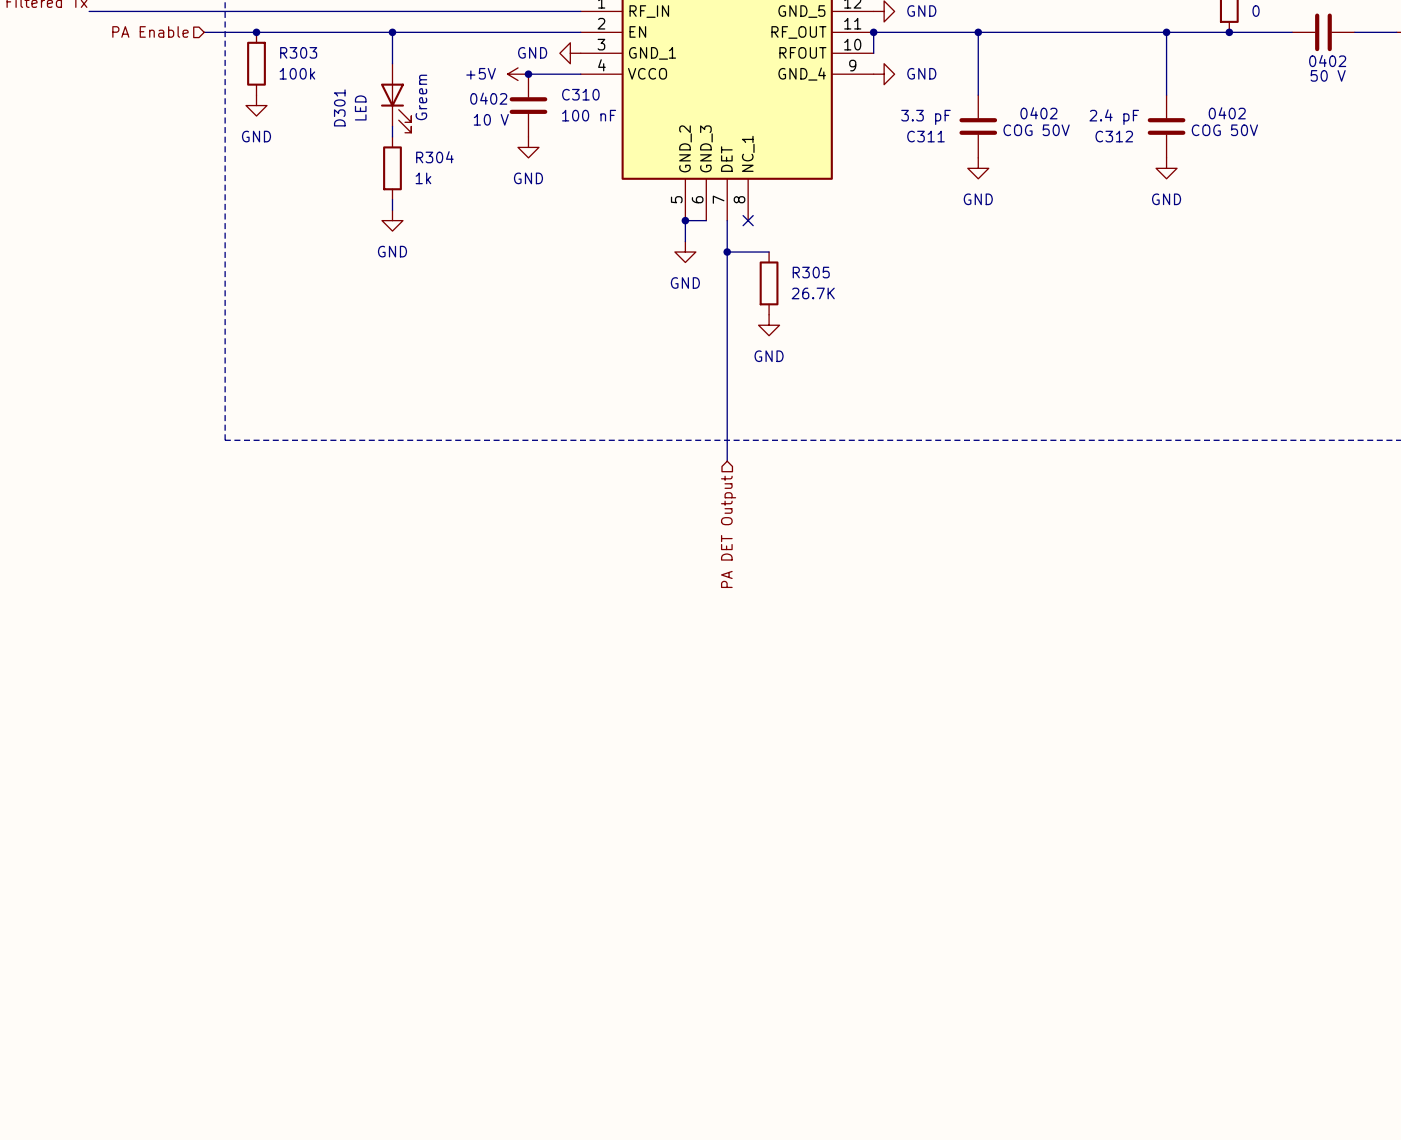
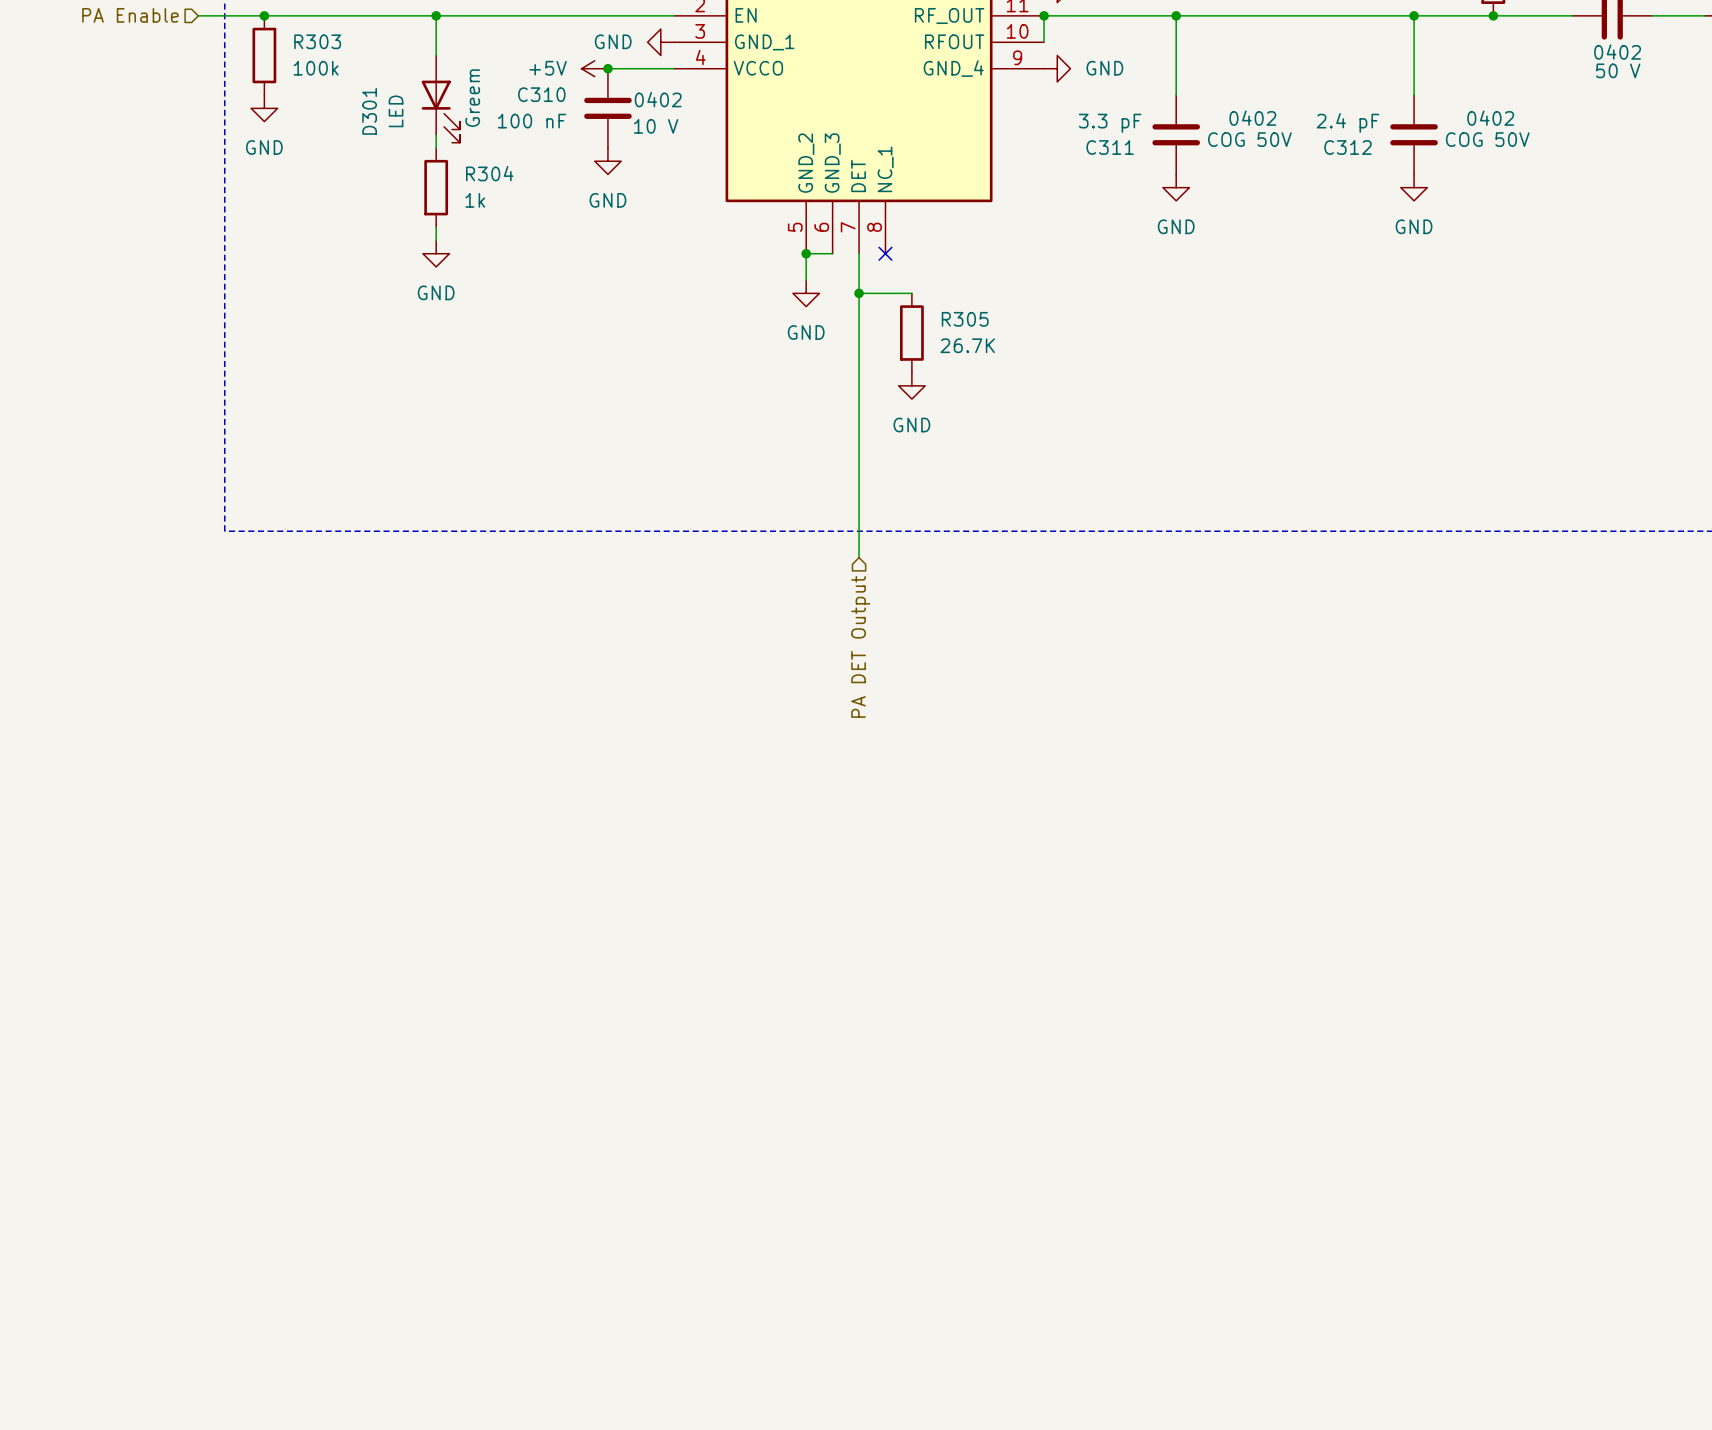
C310 name position: C310 (580, 94) -> C310 (541, 94)
C310 text position: 0402 (488, 98) -> 0402 (658, 99)
C310 value position: 100 nF (589, 115) -> 100 nF (532, 121)
C310 text position: 10 V (491, 119) -> 10 V (656, 126)

